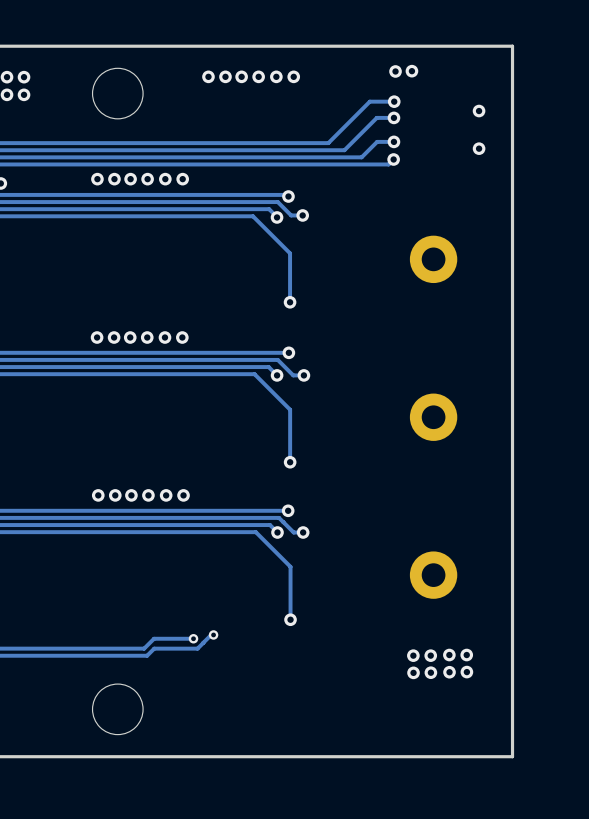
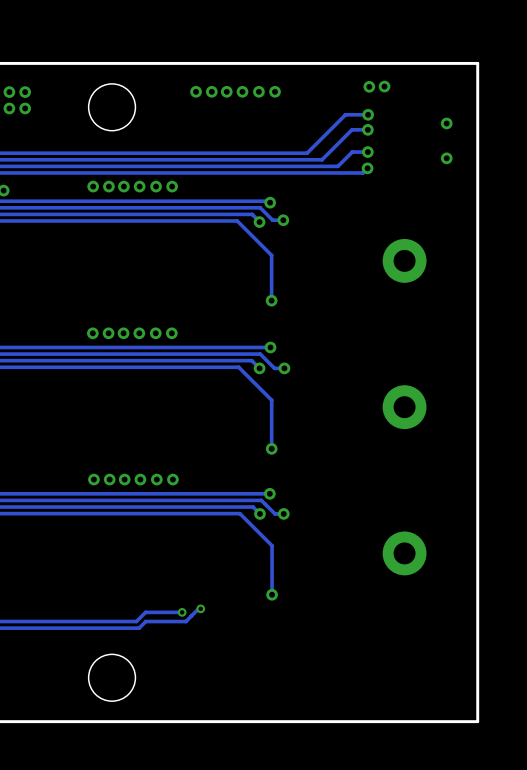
via: (413, 655) -> none
via: (430, 655) -> none
via: (449, 655) -> none
via: (466, 655) -> none
via: (413, 672) -> none
via: (430, 672) -> none
via: (449, 672) -> none
via: (466, 672) -> none

